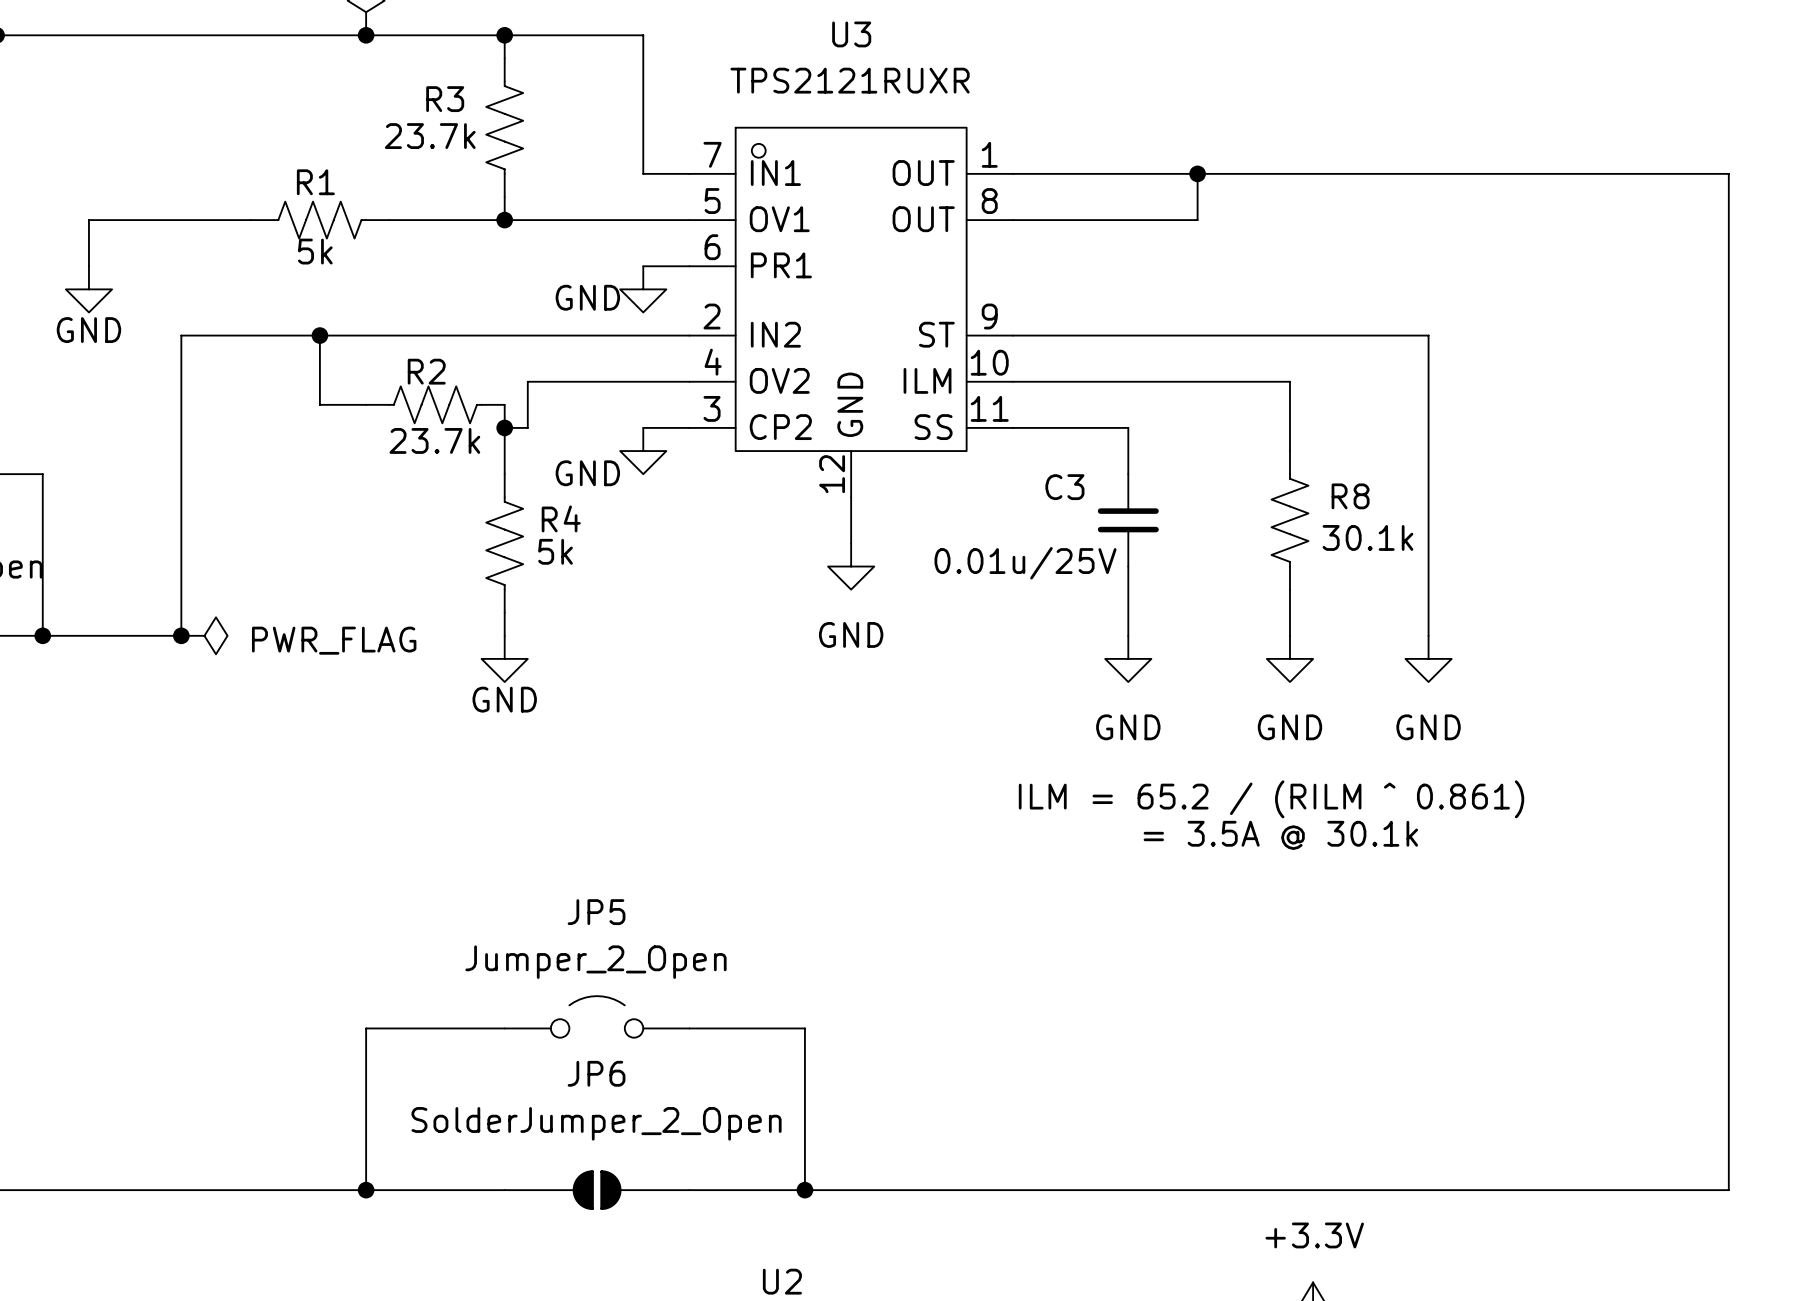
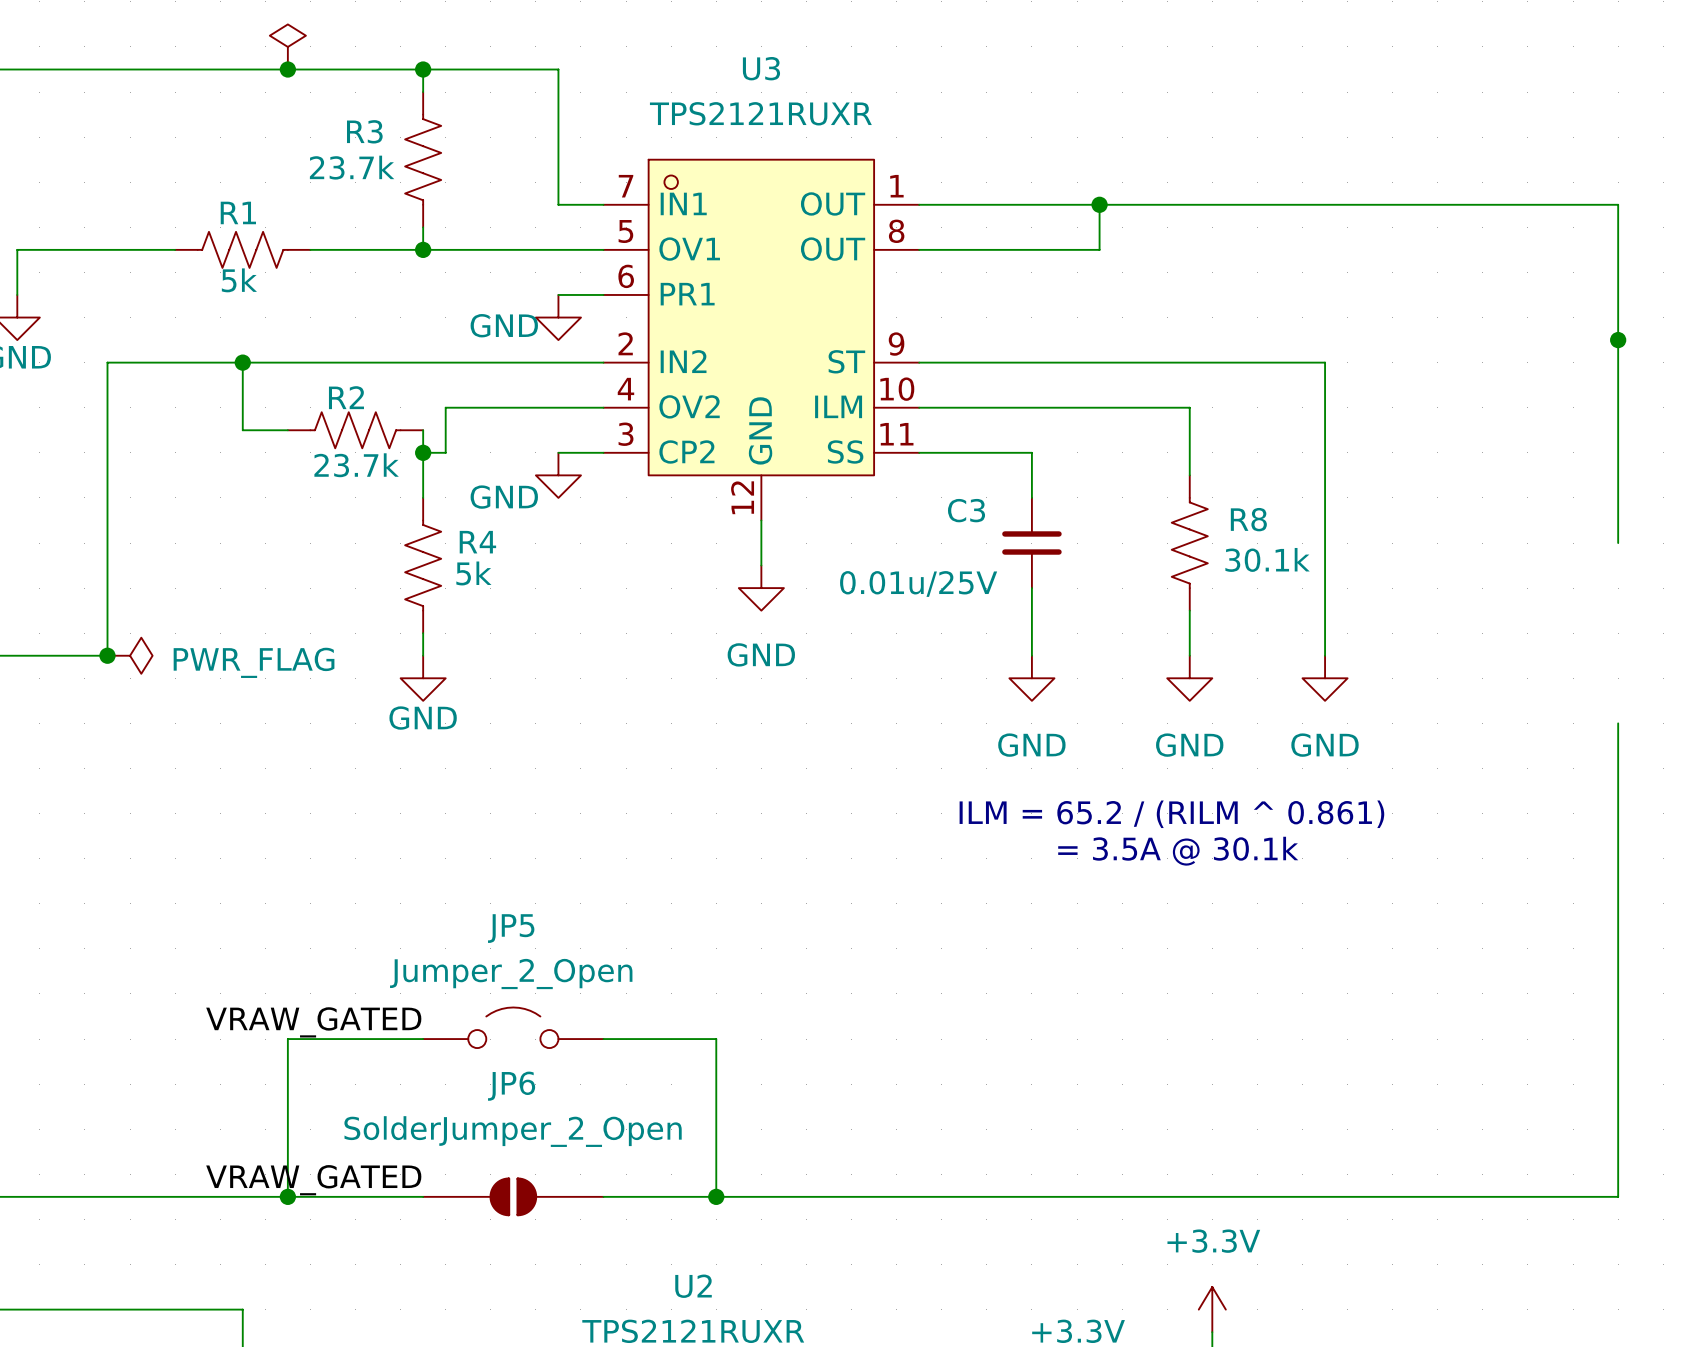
junction: none -> (1618, 340)
wire: (1728, 520) (1728, 705) -> none
label: none -> VRAW_GATED (313, 1022)
label: none -> VRAW_GATED (313, 1180)

